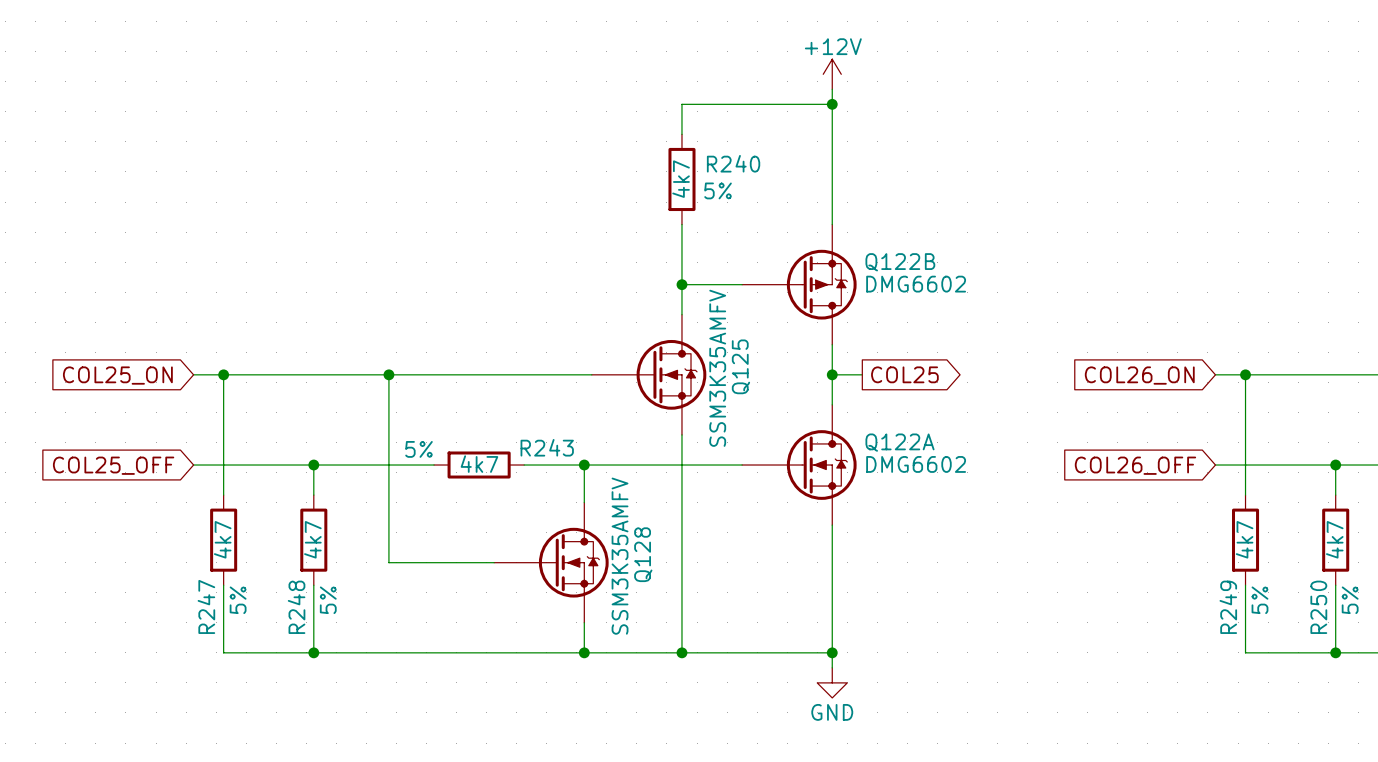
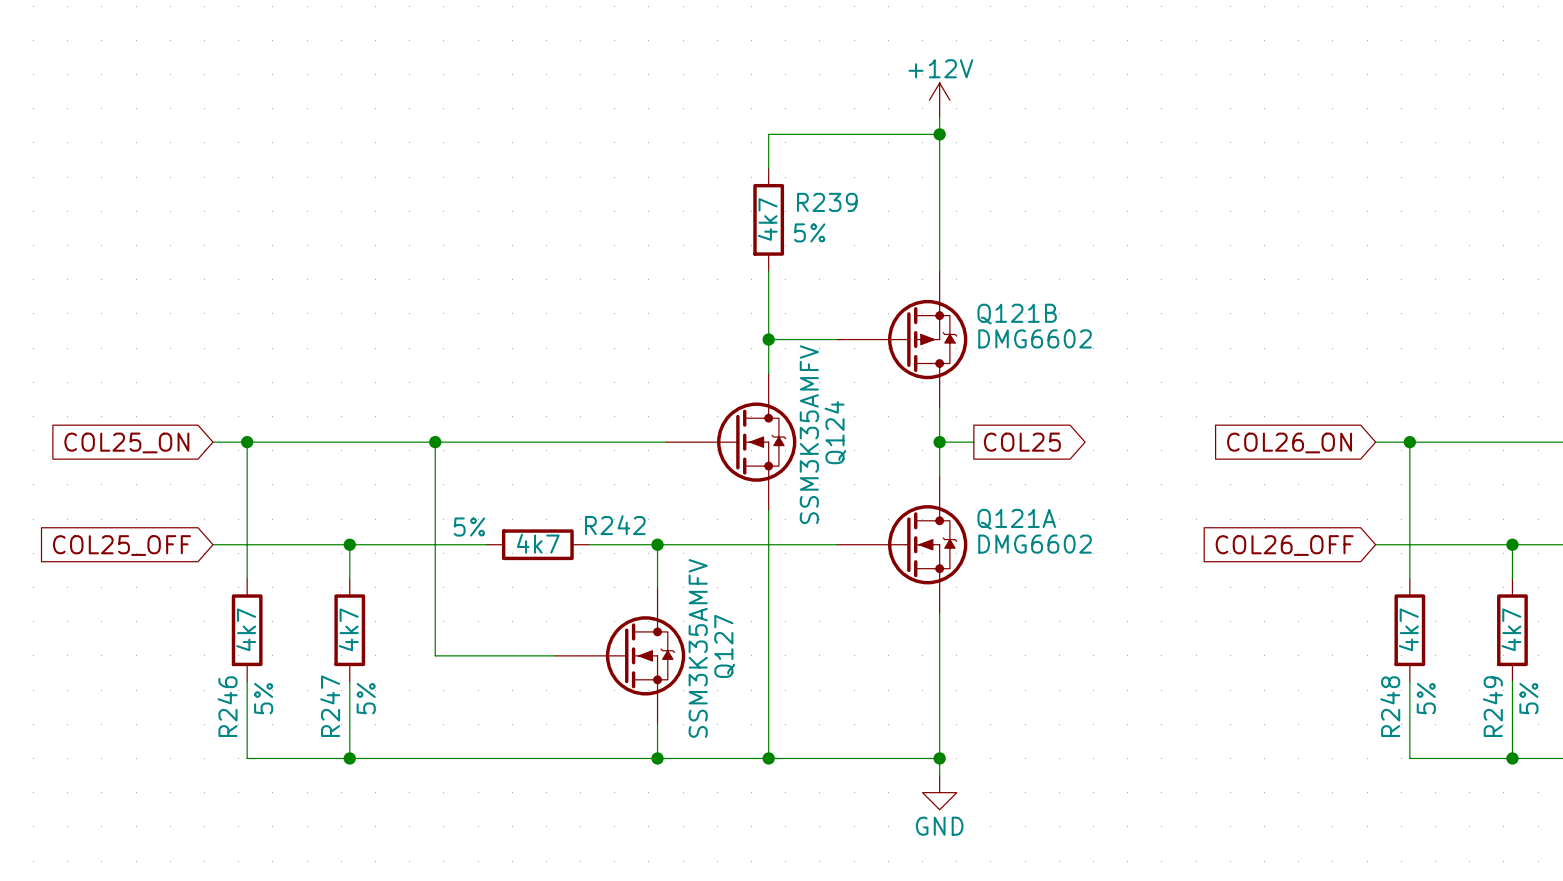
R240 name: R240 (733, 163) -> R239 (827, 202)
Q122B name: Q122B (900, 262) -> Q121B (1017, 314)
Q125 name: Q125 (740, 366) -> Q124 (835, 432)
Q122A name: Q122A (900, 442) -> Q121A (1016, 519)
R243 name: R243 (547, 447) -> R242 (615, 525)
Q128 name: Q128 (643, 554) -> Q127 (724, 646)
R247 name: R247 (206, 606) -> R246 (227, 706)
R248 name: R248 (296, 607) -> R247 (330, 706)
R249 name: R249 (1228, 607) -> R248 (1390, 706)
R250 name: R250 (1318, 607) -> R249 (1492, 706)

